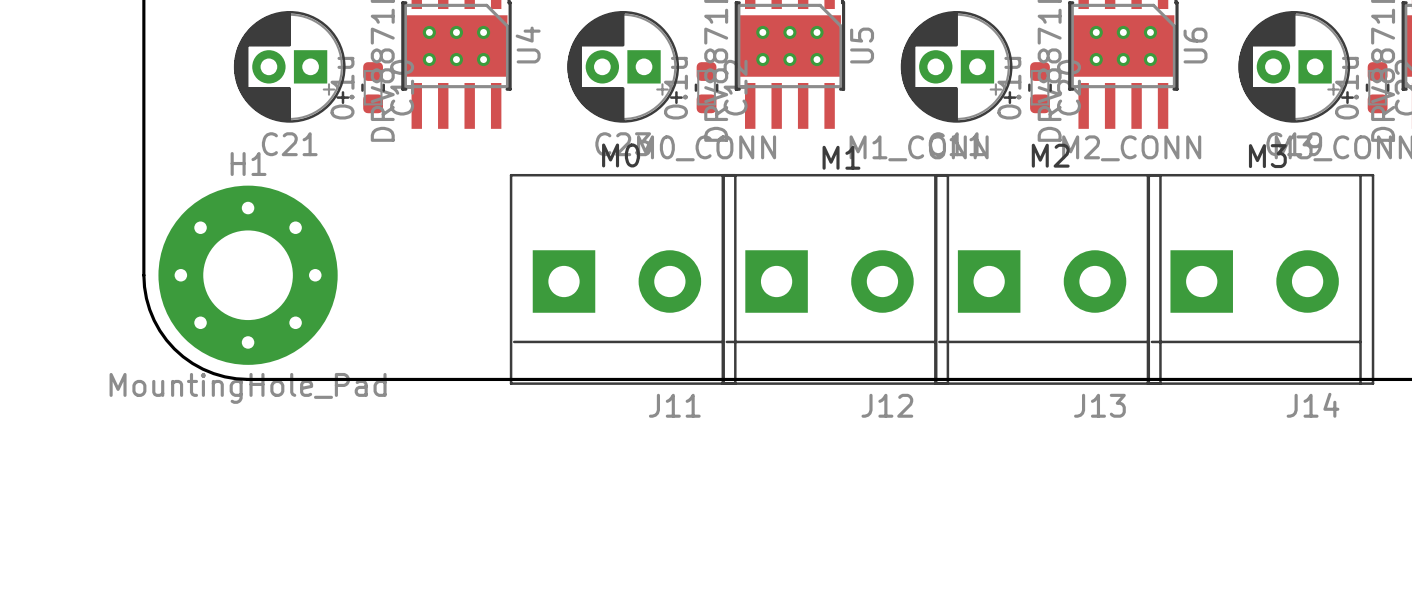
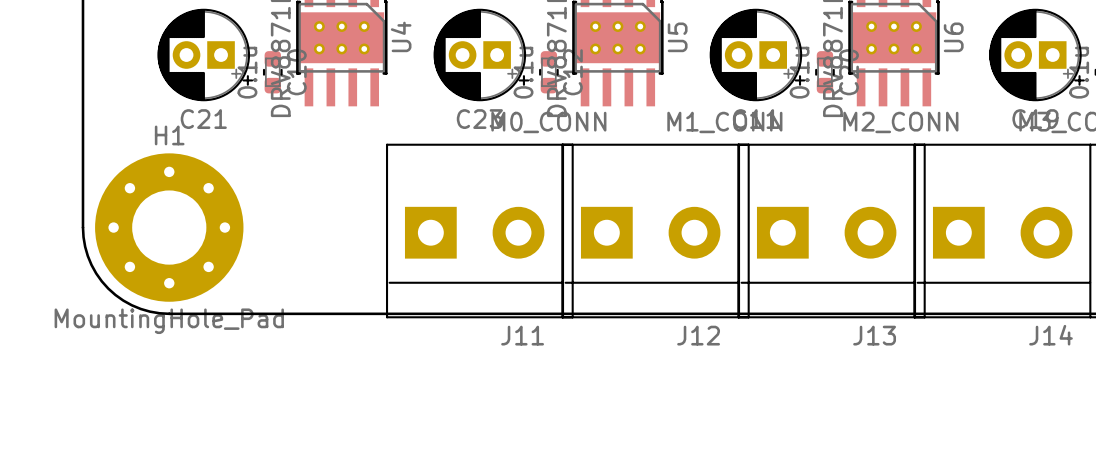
text: M0 (620, 155) -> none
text: M2 (1050, 155) -> none
text: M3 (1267, 156) -> none
text: M1 (841, 157) -> none

